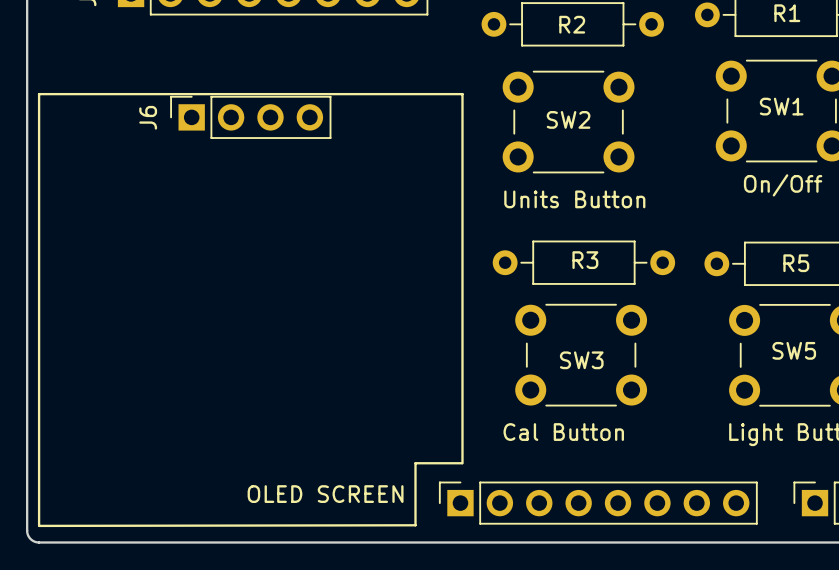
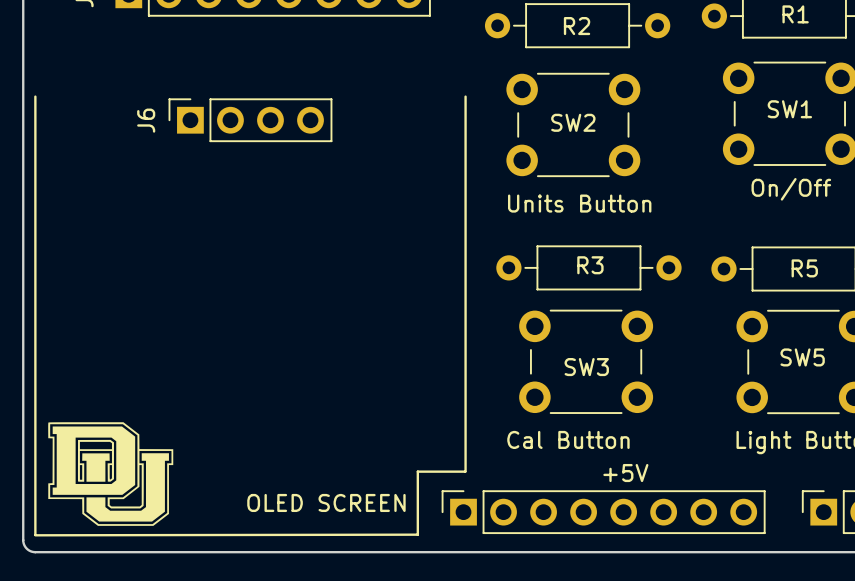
line: (39, 94) (462, 94) -> none
drawing: none -> [48, 422, 174, 526]
text: none -> +5V (625, 473)

